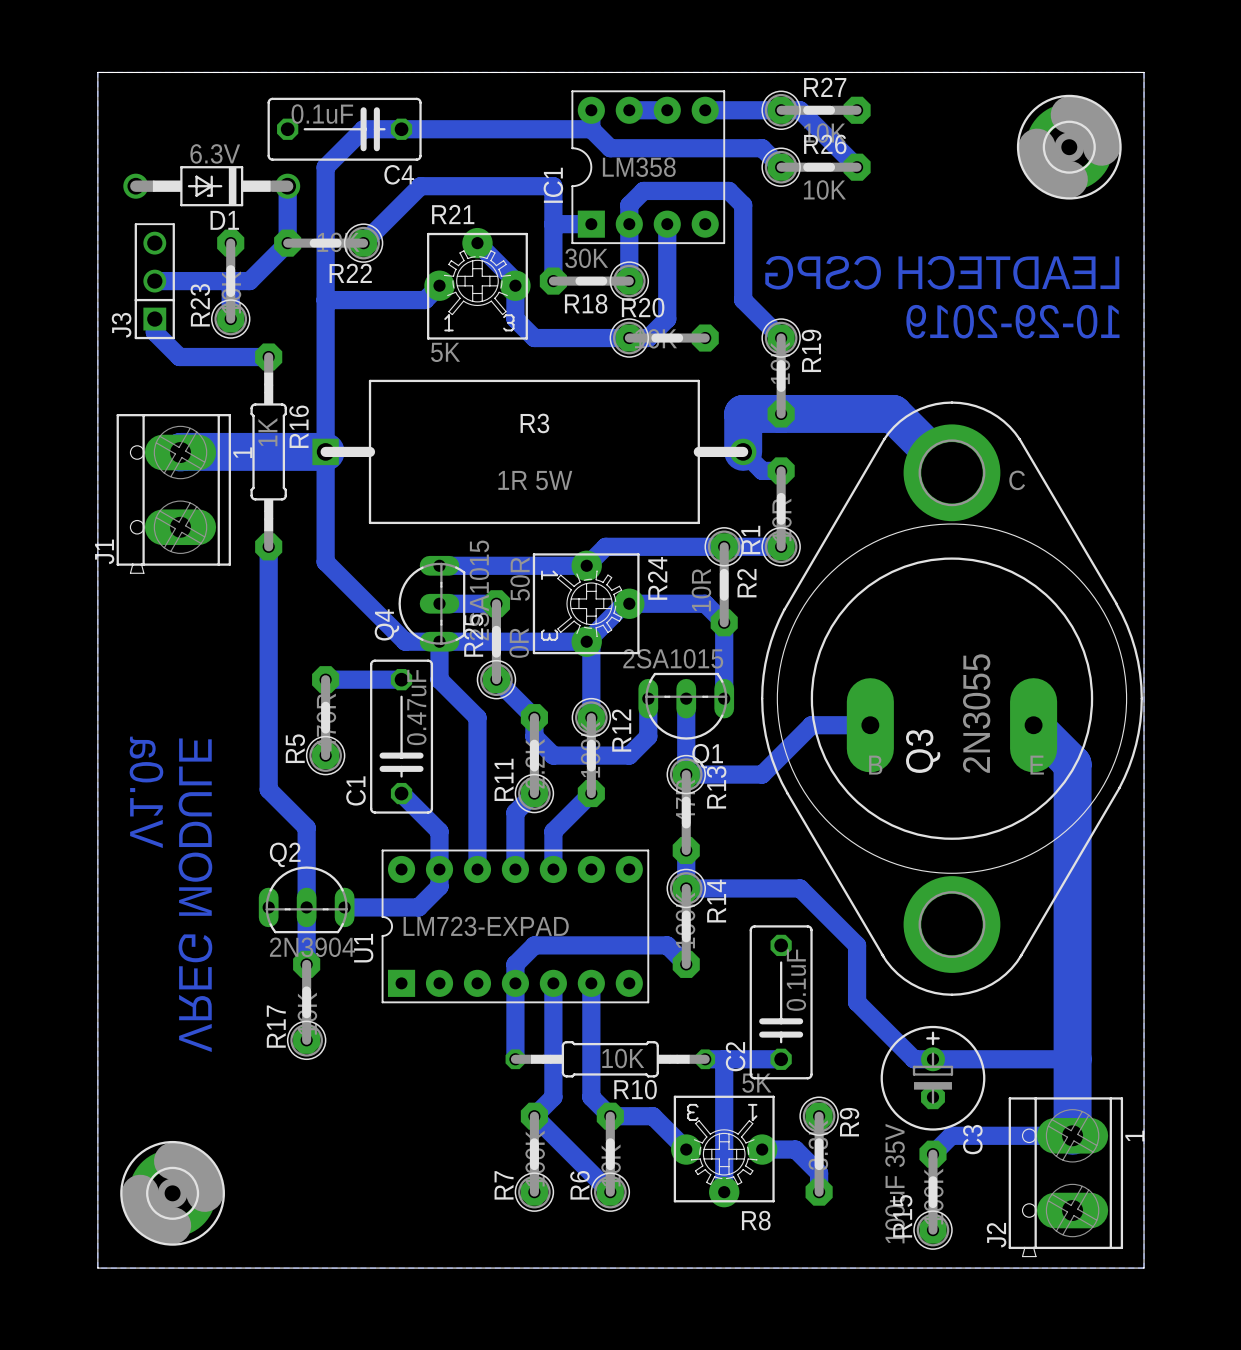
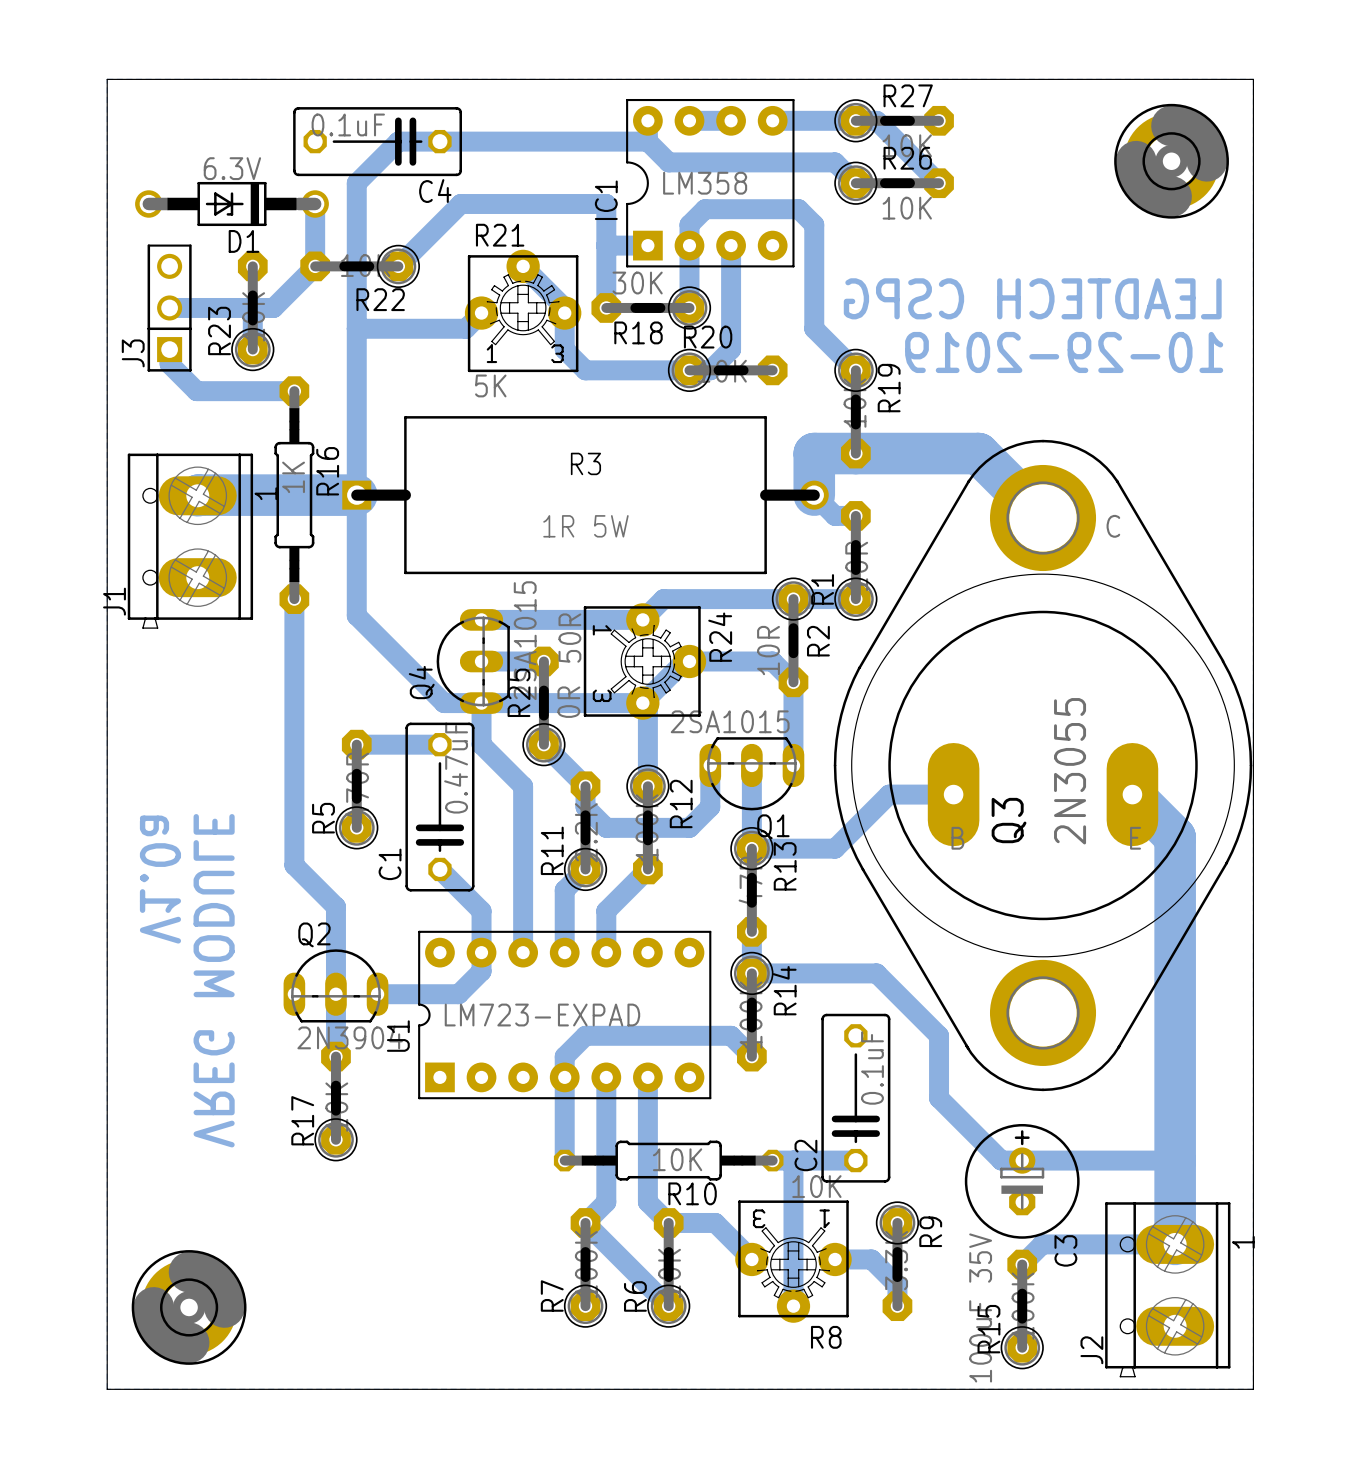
R8 value: 5K (756, 1083) -> 10K (816, 1186)

